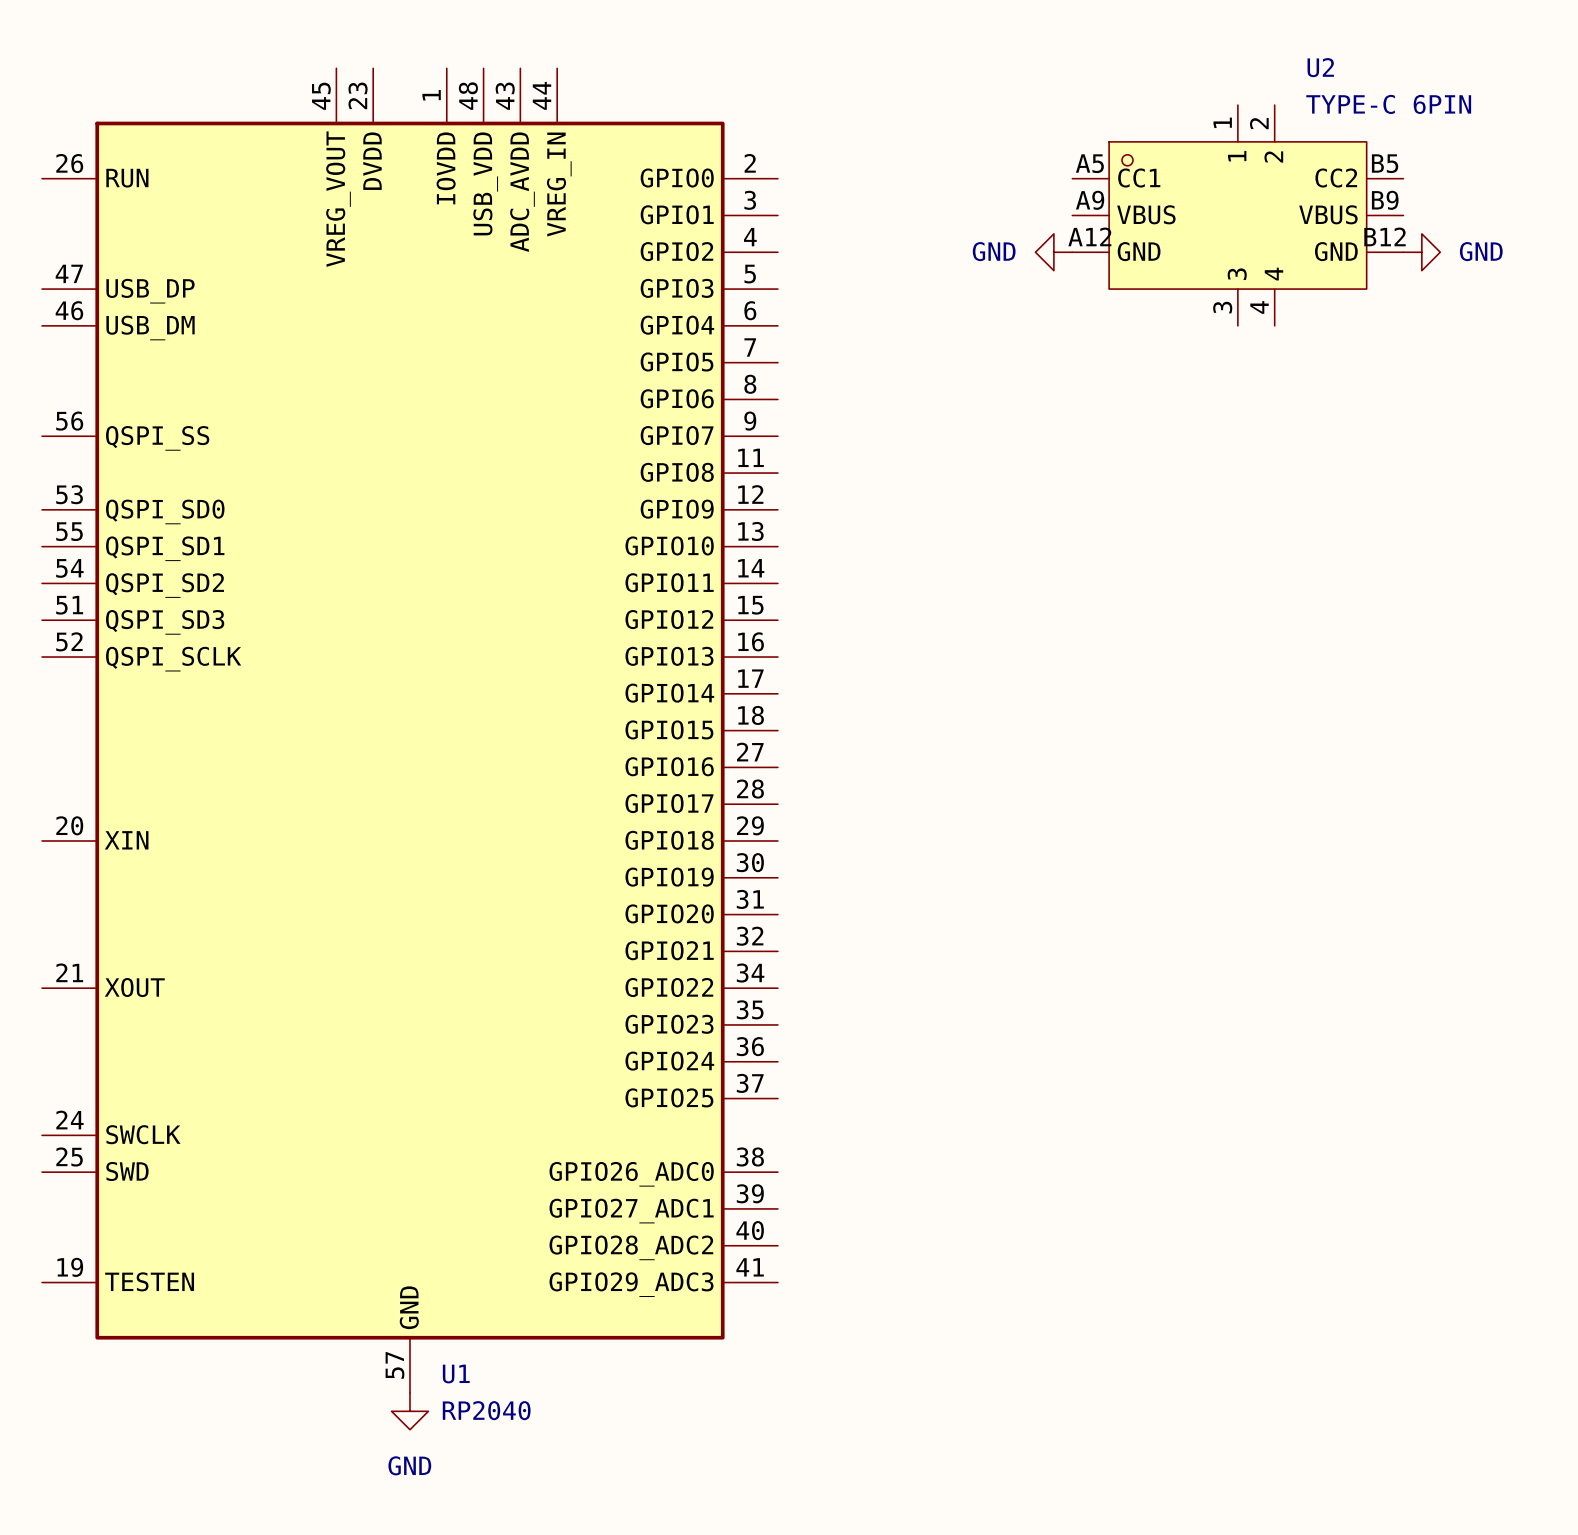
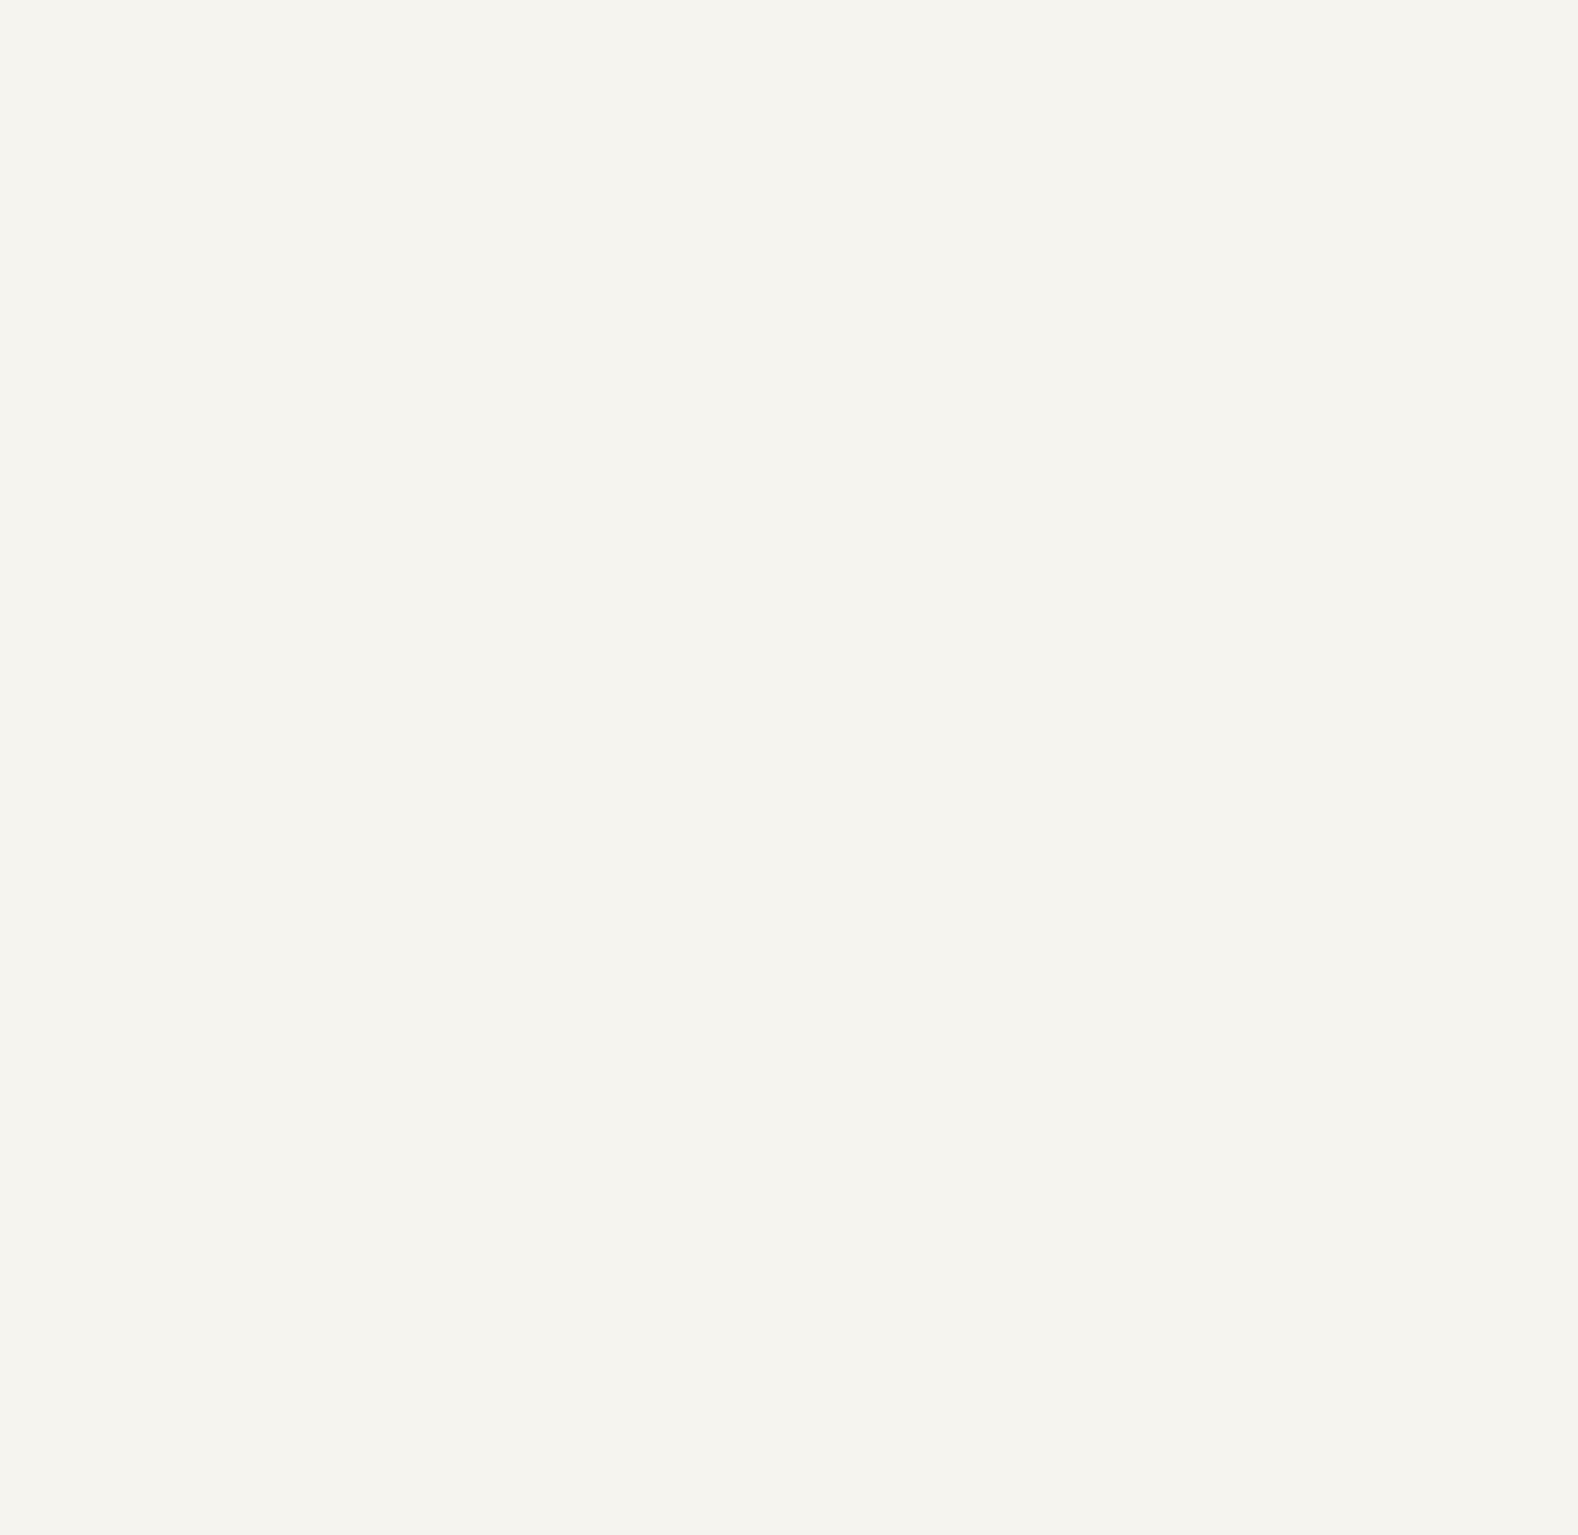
U2: TYPE-C 6PIN (1237, 215) -> none
power symbol: GND (1053, 252) -> none
power symbol: GND (1421, 252) -> none
U1: RP2040 (409, 730) -> none
power symbol: GND (409, 1411) -> none

